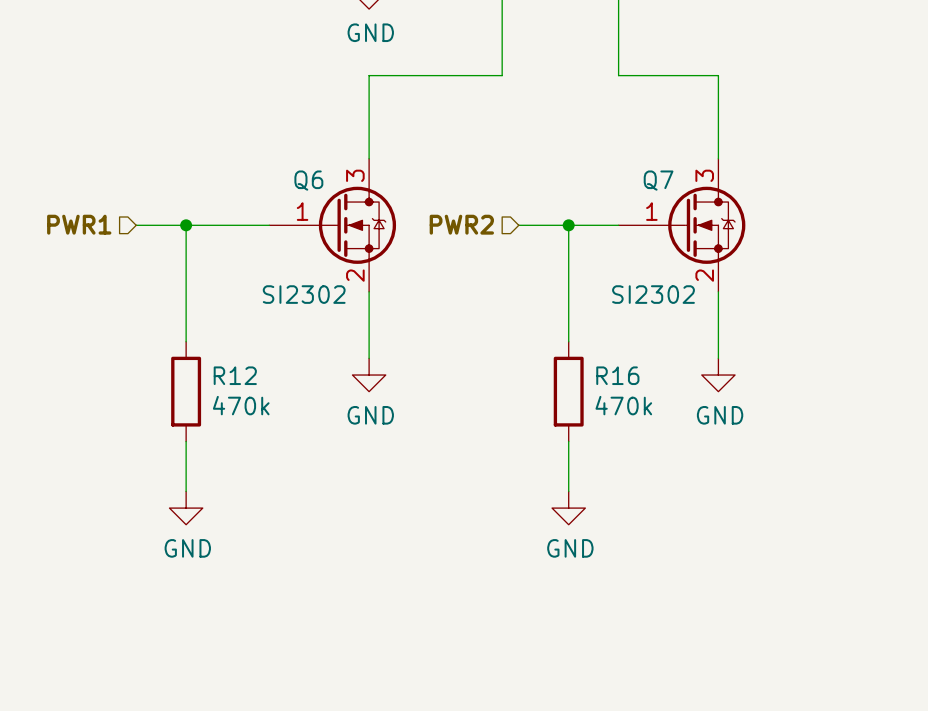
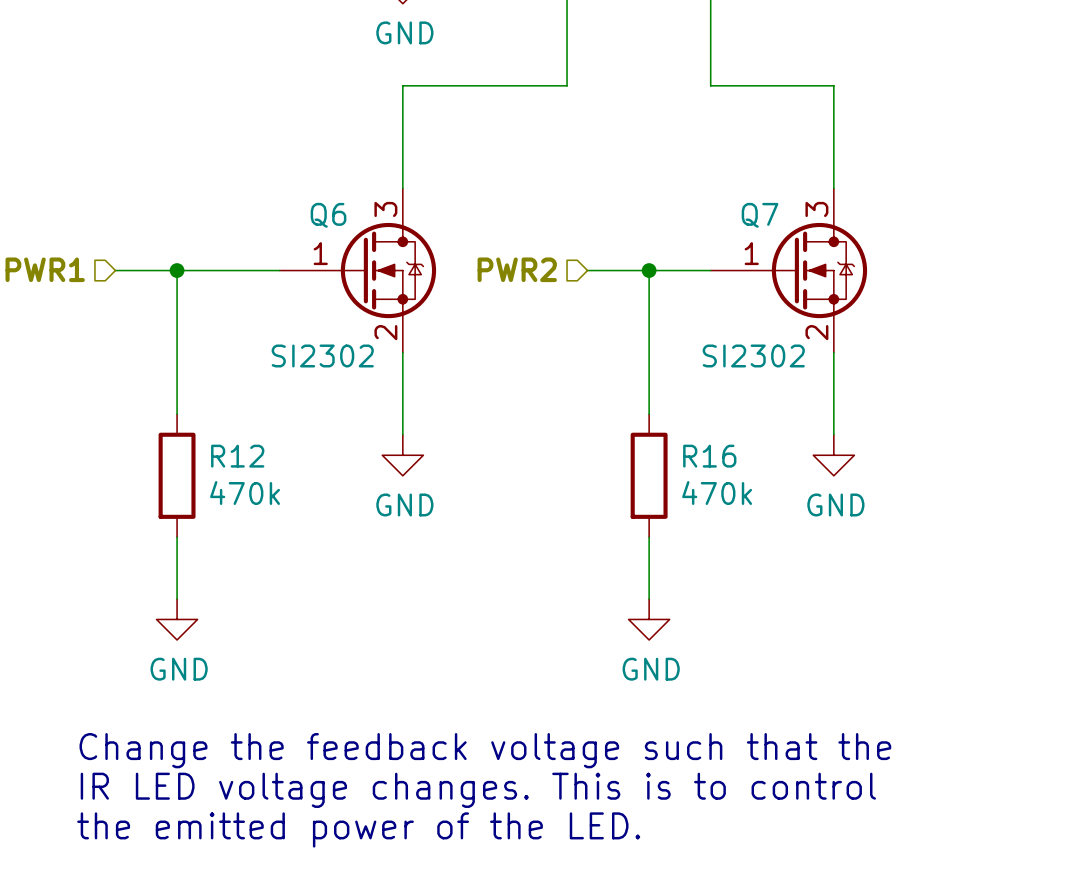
text: none -> Change the feedback voltage such that the (485, 750)
text: none -> IR LED voltage changes. This is to control (478, 790)
text: none -> the emitted power of the LED. (358, 829)

